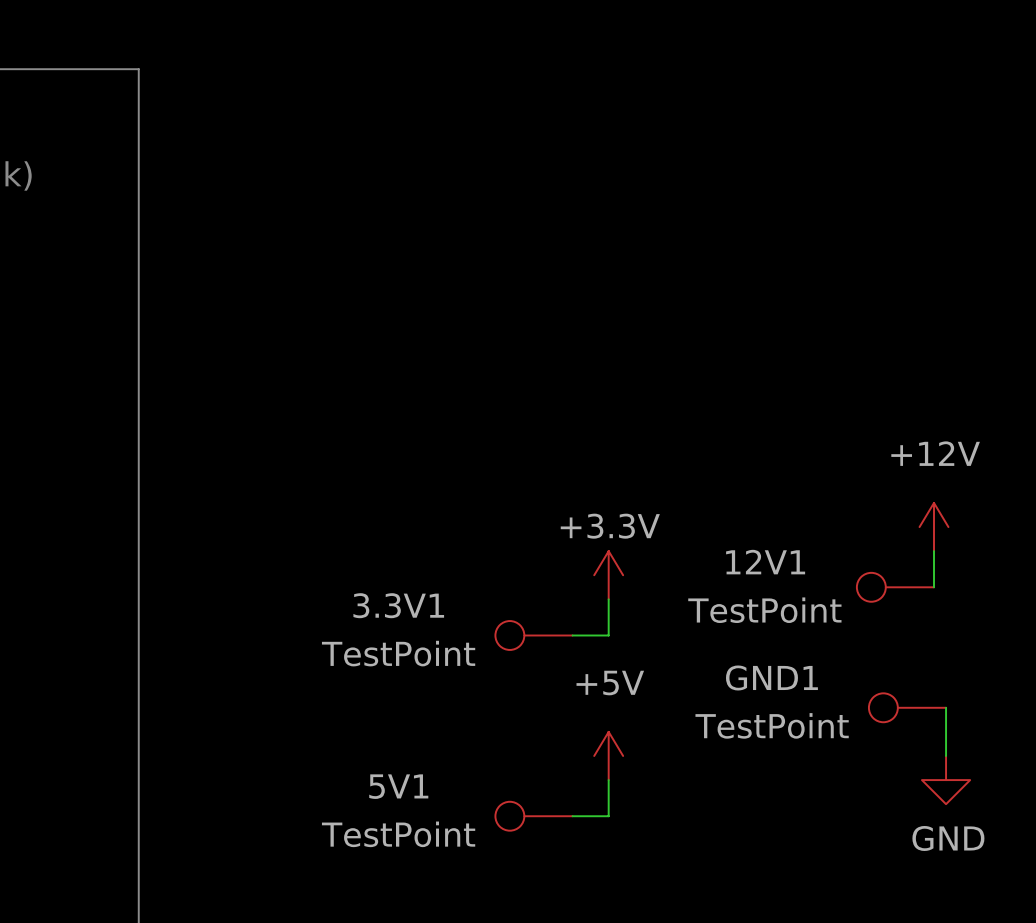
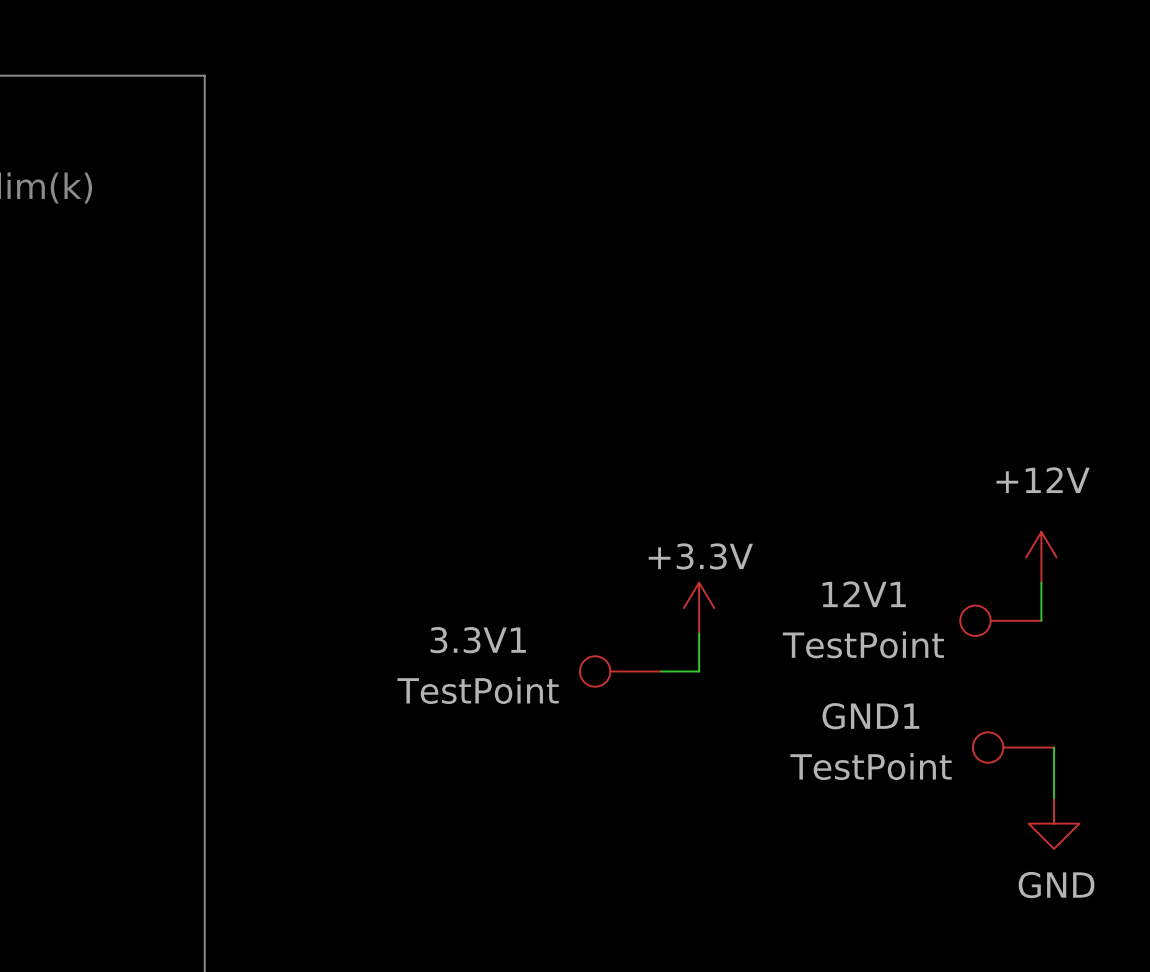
power symbol: +5V (608, 755) -> none
wire: (608, 780) (608, 816) (572, 816) -> none
5V1: TestPoint (533, 816) -> none

